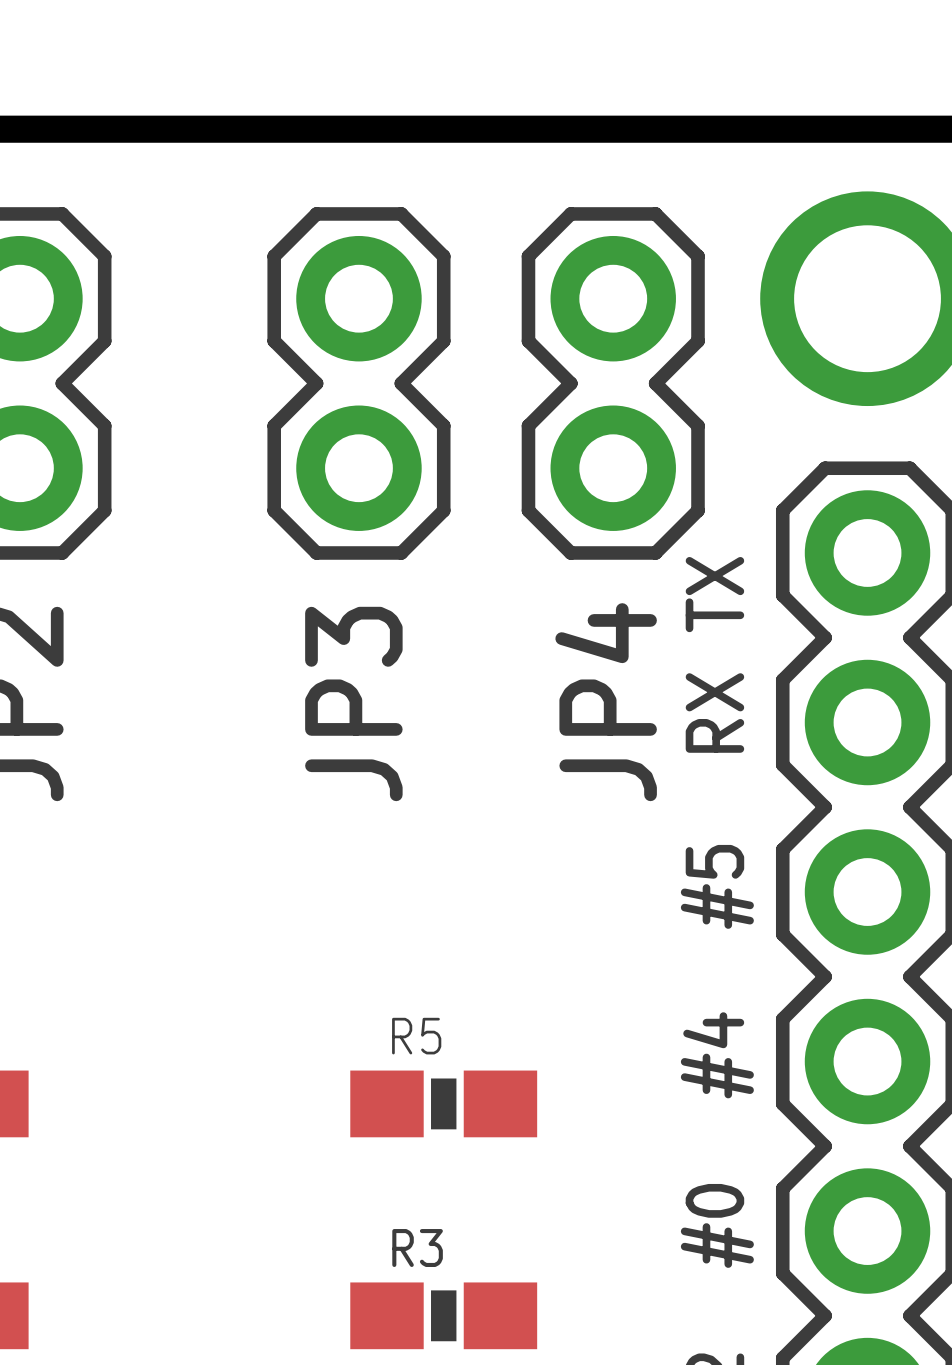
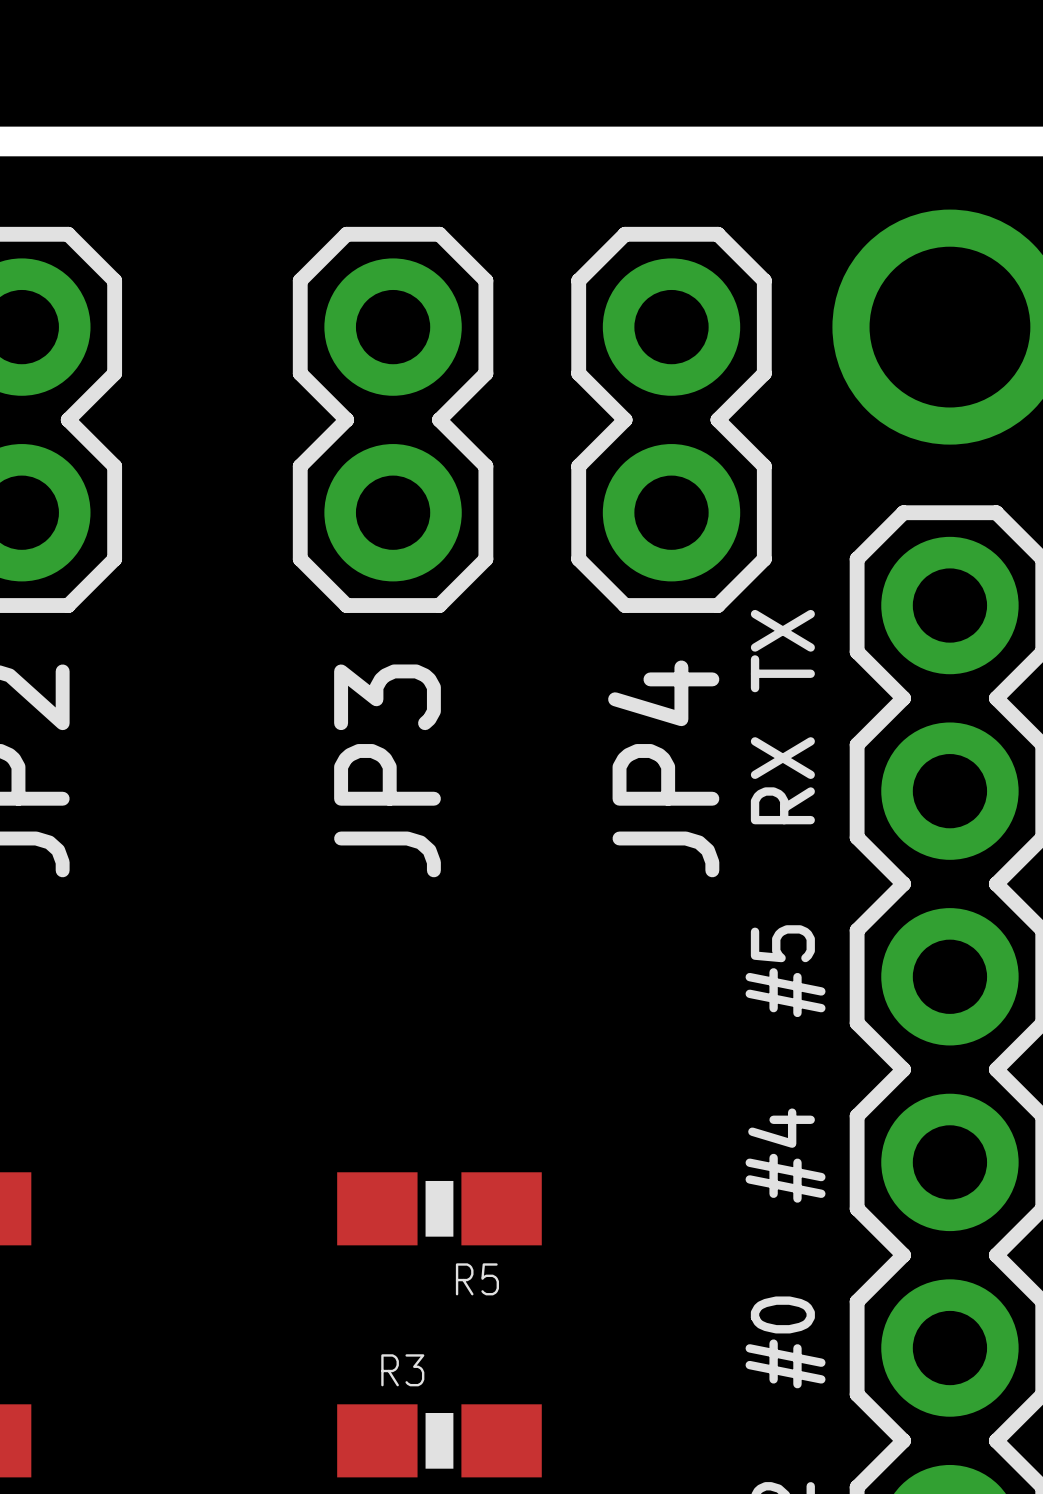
R5 name position: R5 (416, 1036) -> R5 (477, 1279)
R5 position: (443, 1103) -> (439, 1208)
R3 name position: R3 (417, 1248) -> R3 (402, 1370)
R3 position: (443, 1315) -> (439, 1440)

